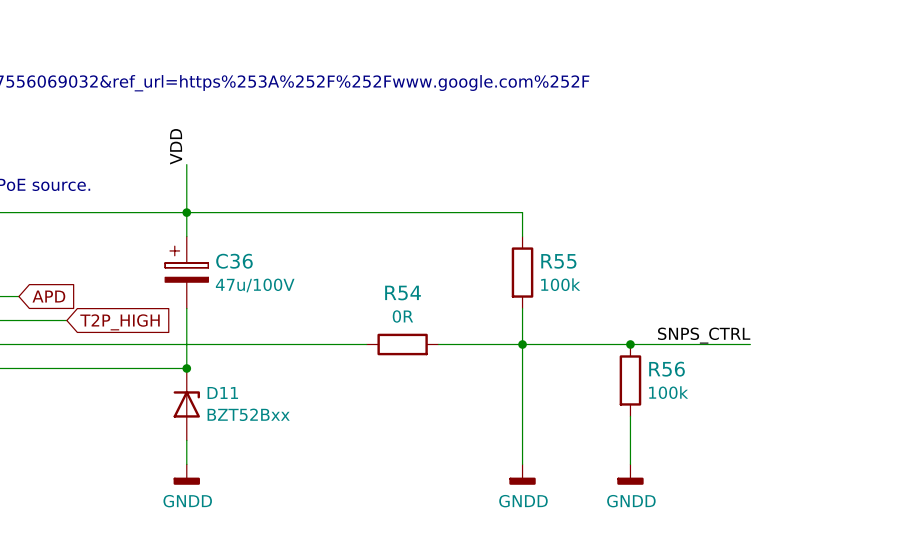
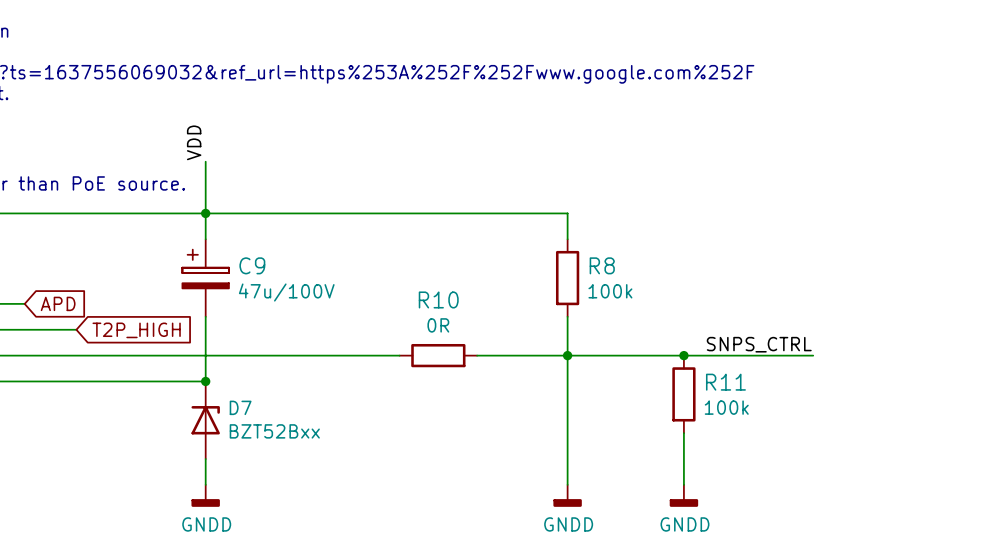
C36 name: C36 (234, 261) -> C9 (252, 265)
R55 name: R55 (558, 261) -> R8 (602, 265)
R54 name: R54 (403, 293) -> R10 (438, 299)
R56 name: R56 (667, 369) -> R11 (725, 382)
D11 name: D11 (222, 392) -> D7 (240, 407)

